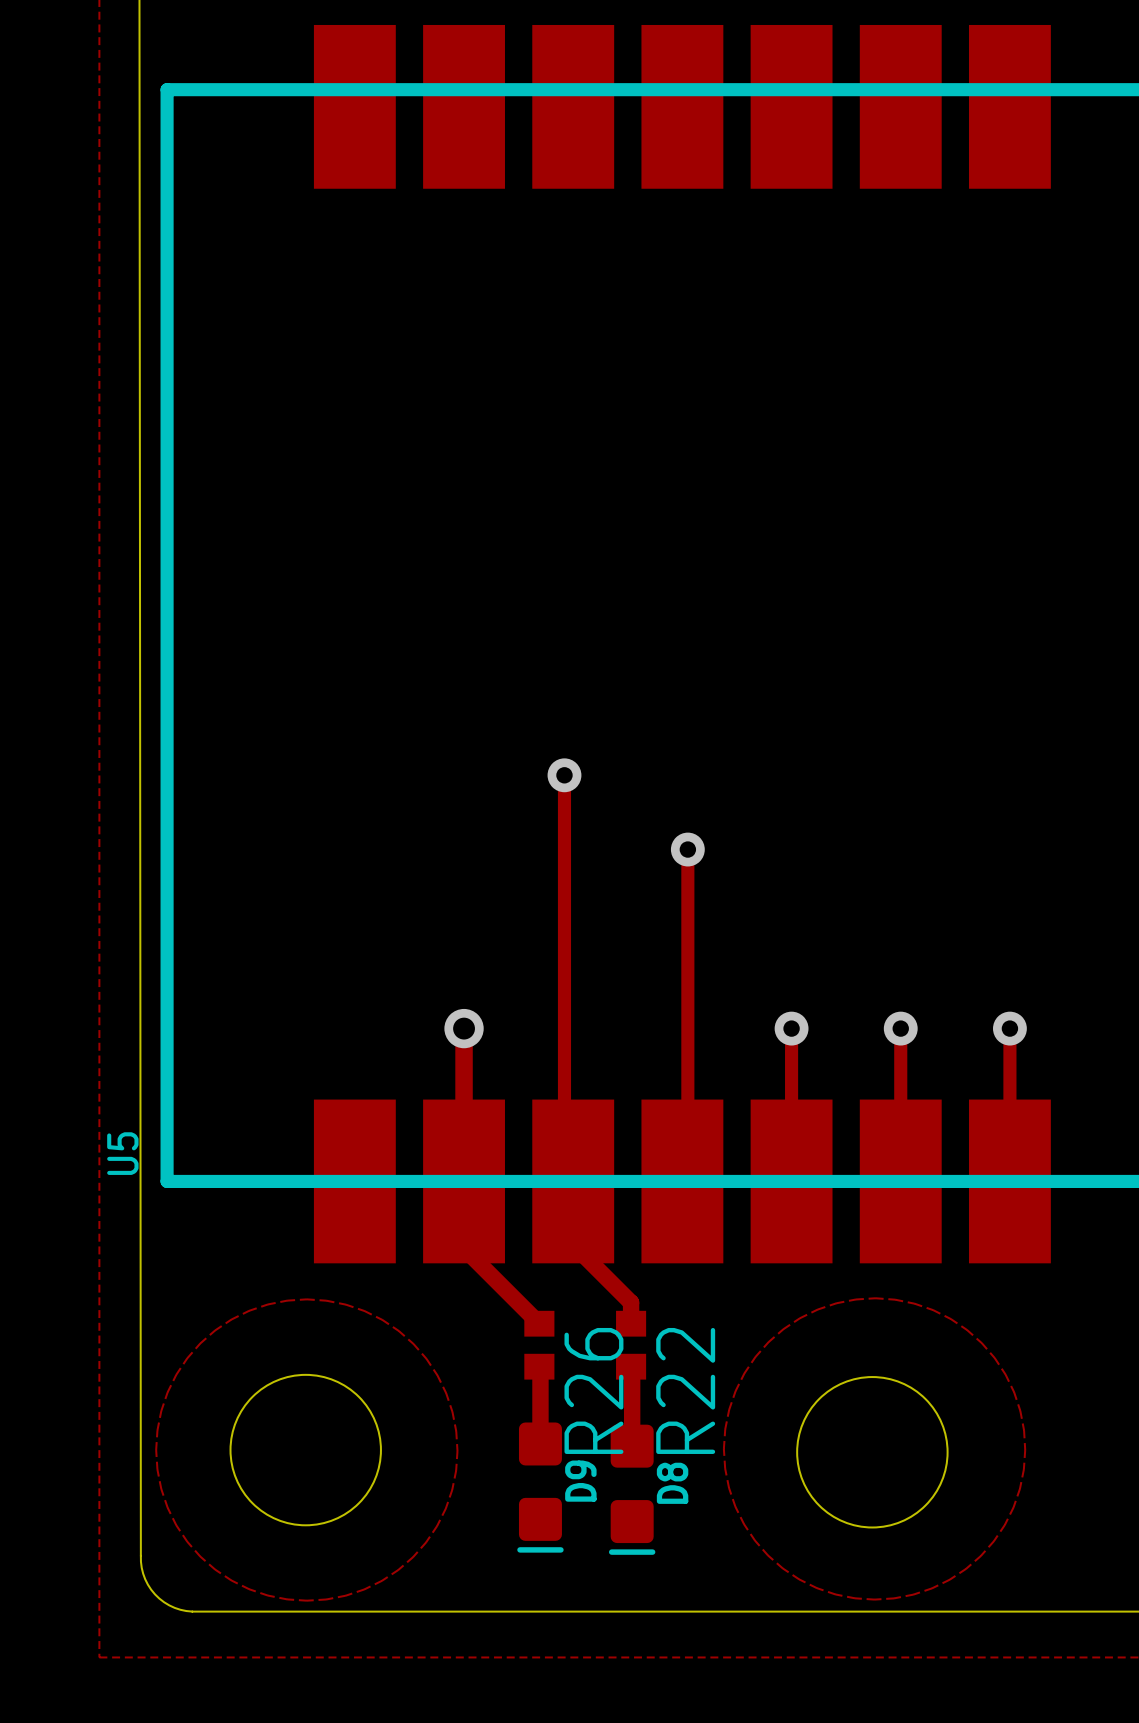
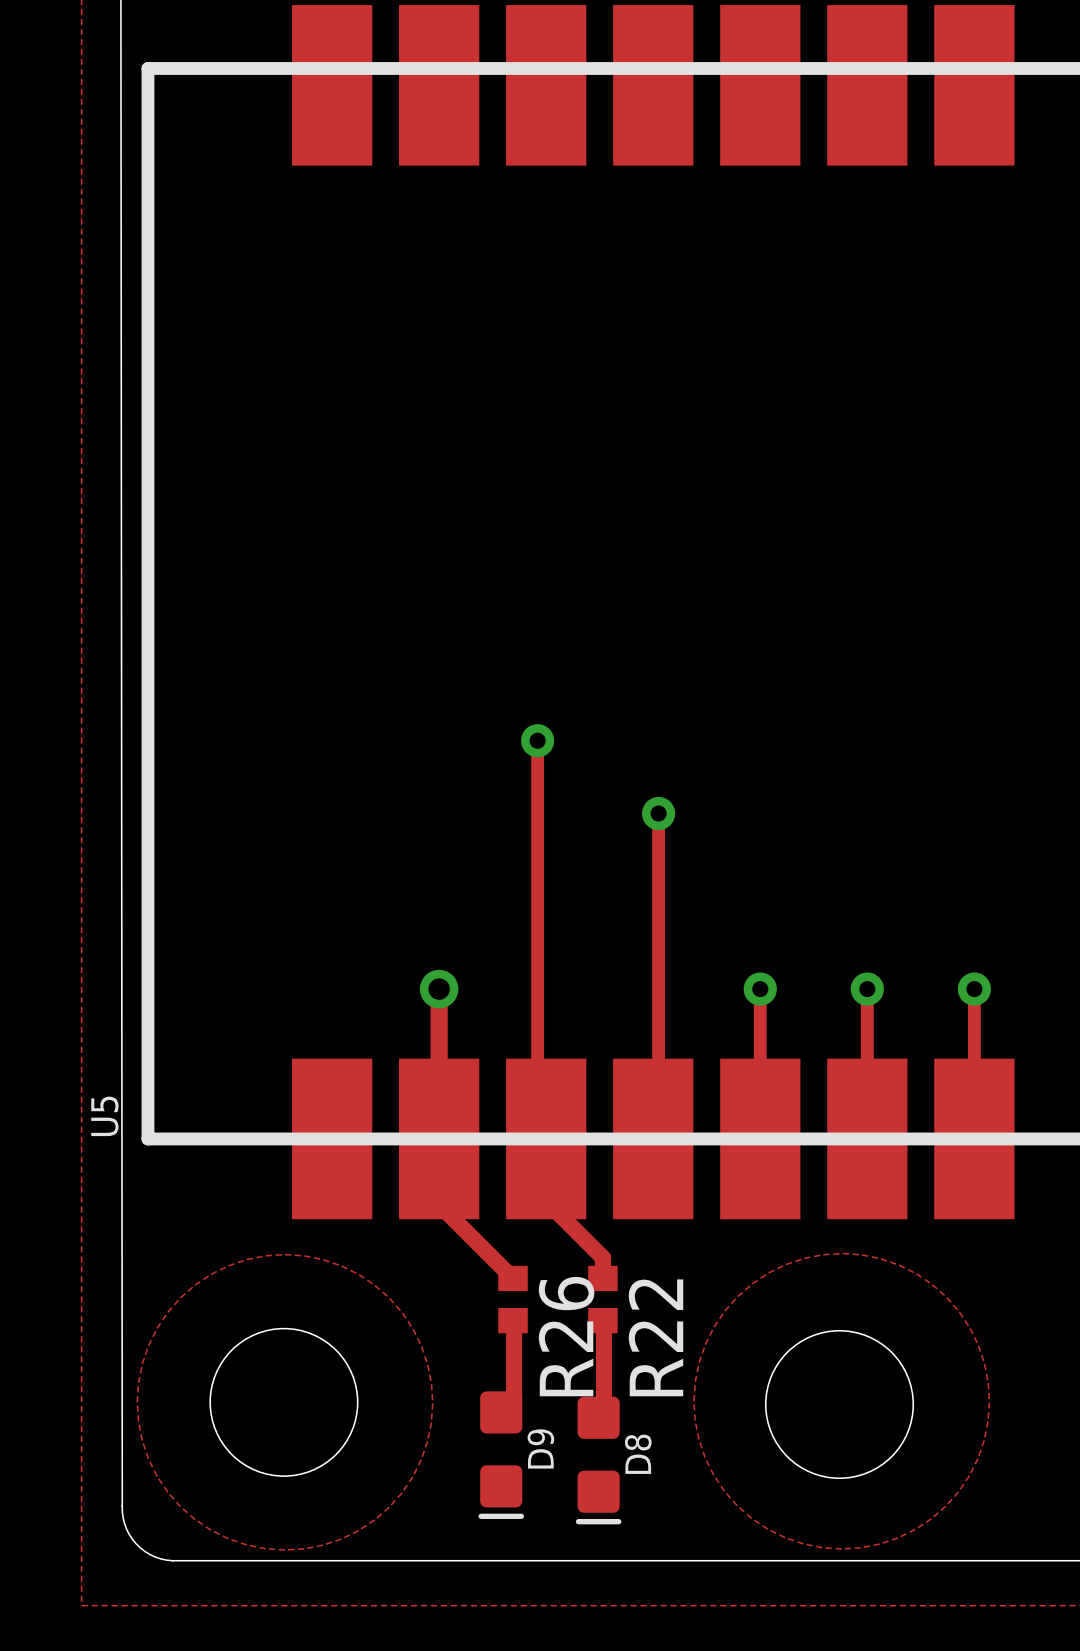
D9 position: (540, 1487) -> (501, 1455)
D8 position: (632, 1489) -> (598, 1460)

